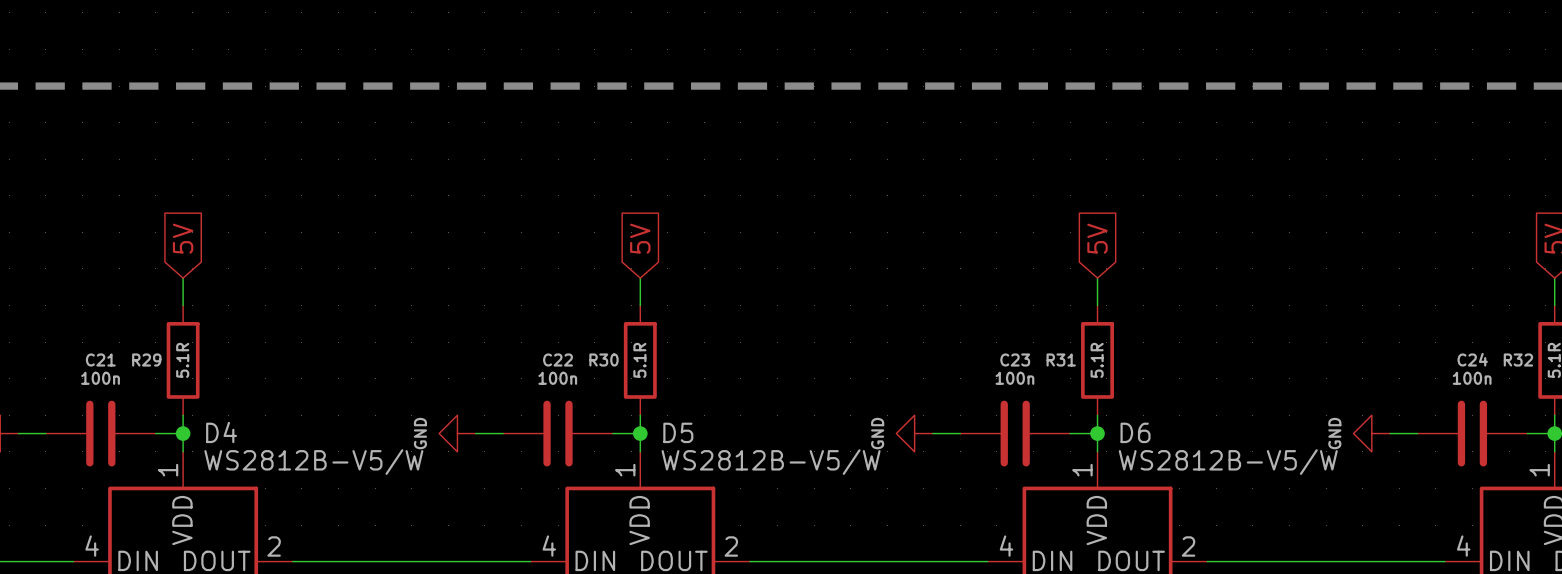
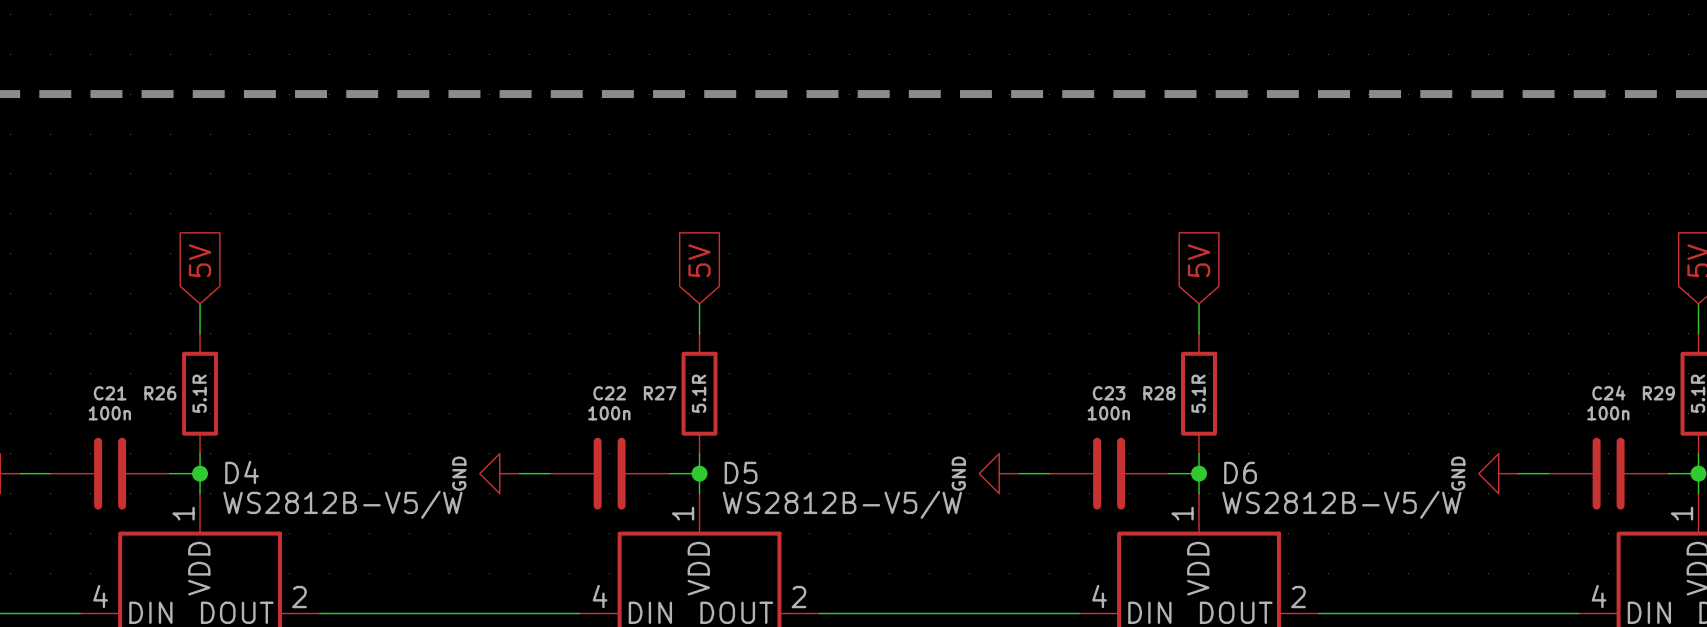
R29 name: R29 (146, 360) -> R26 (160, 393)
R30 name: R30 (603, 360) -> R27 (660, 393)
R31 name: R31 (1061, 360) -> R28 (1159, 393)
R32 name: R32 (1518, 360) -> R29 (1658, 393)

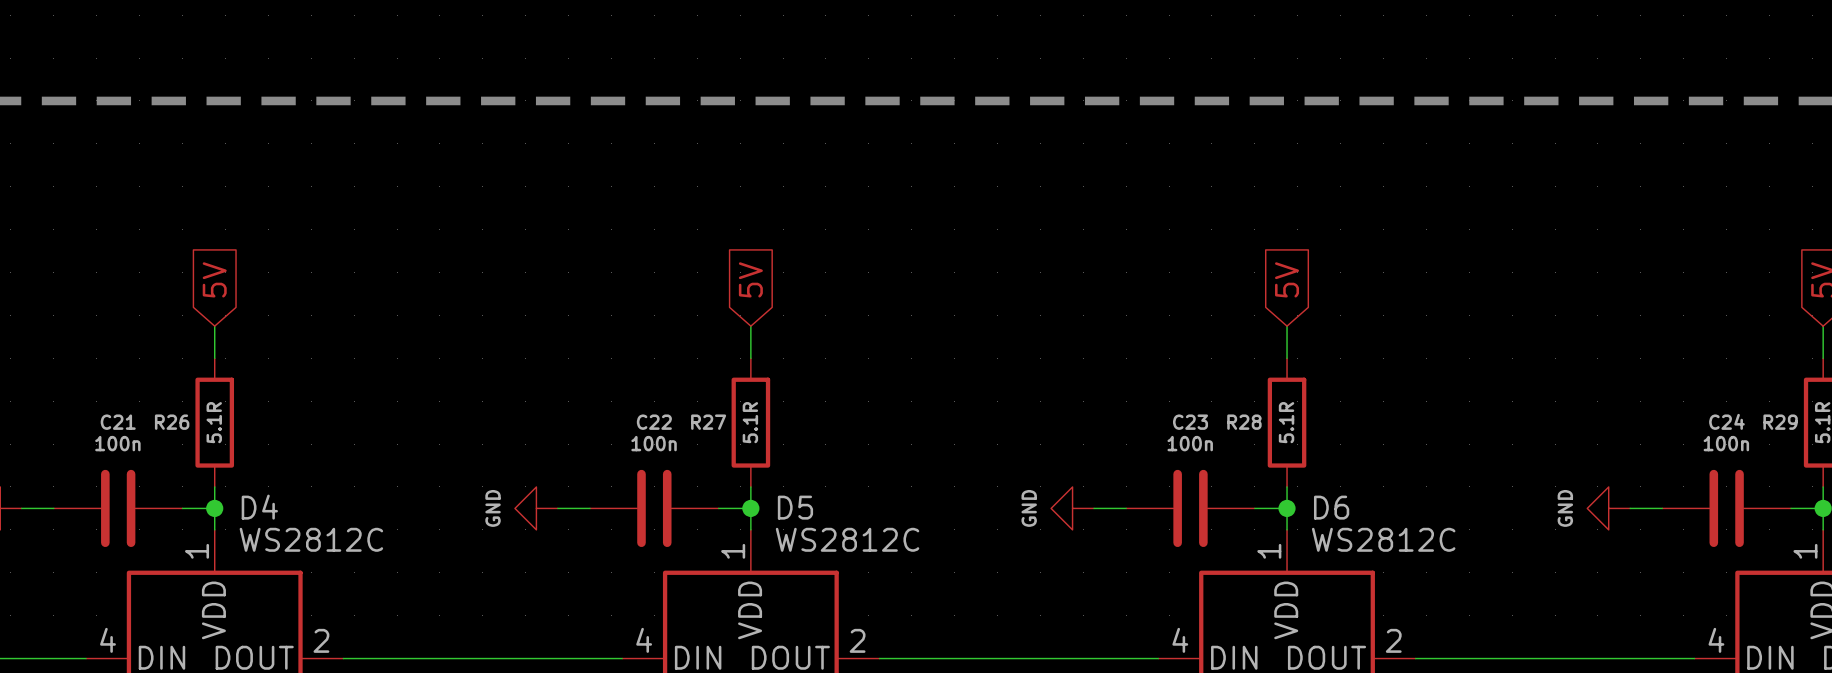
D4 value: WS2812B-V5/W (342, 504) -> WS2812C (311, 539)
D5 value: WS2812B-V5/W (842, 504) -> WS2812C (847, 539)
D6 value: WS2812B-V5/W (1341, 504) -> WS2812C (1383, 539)

